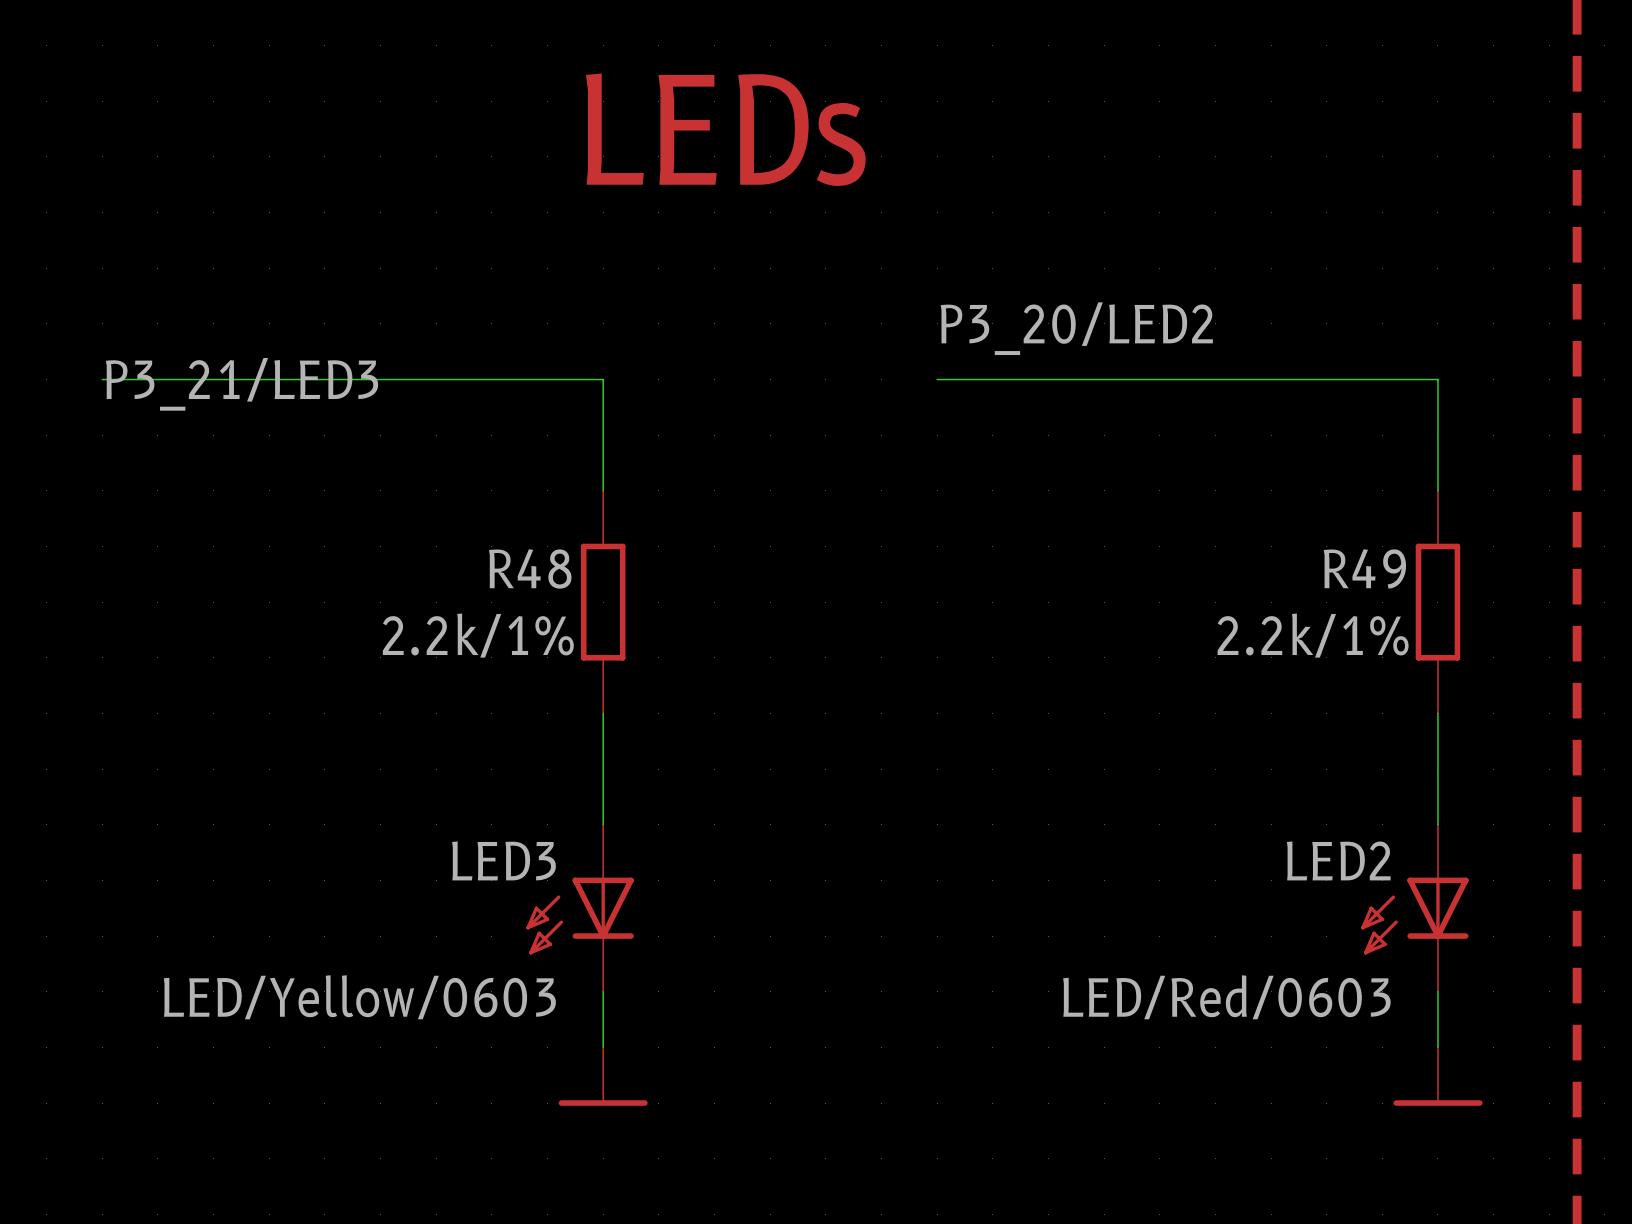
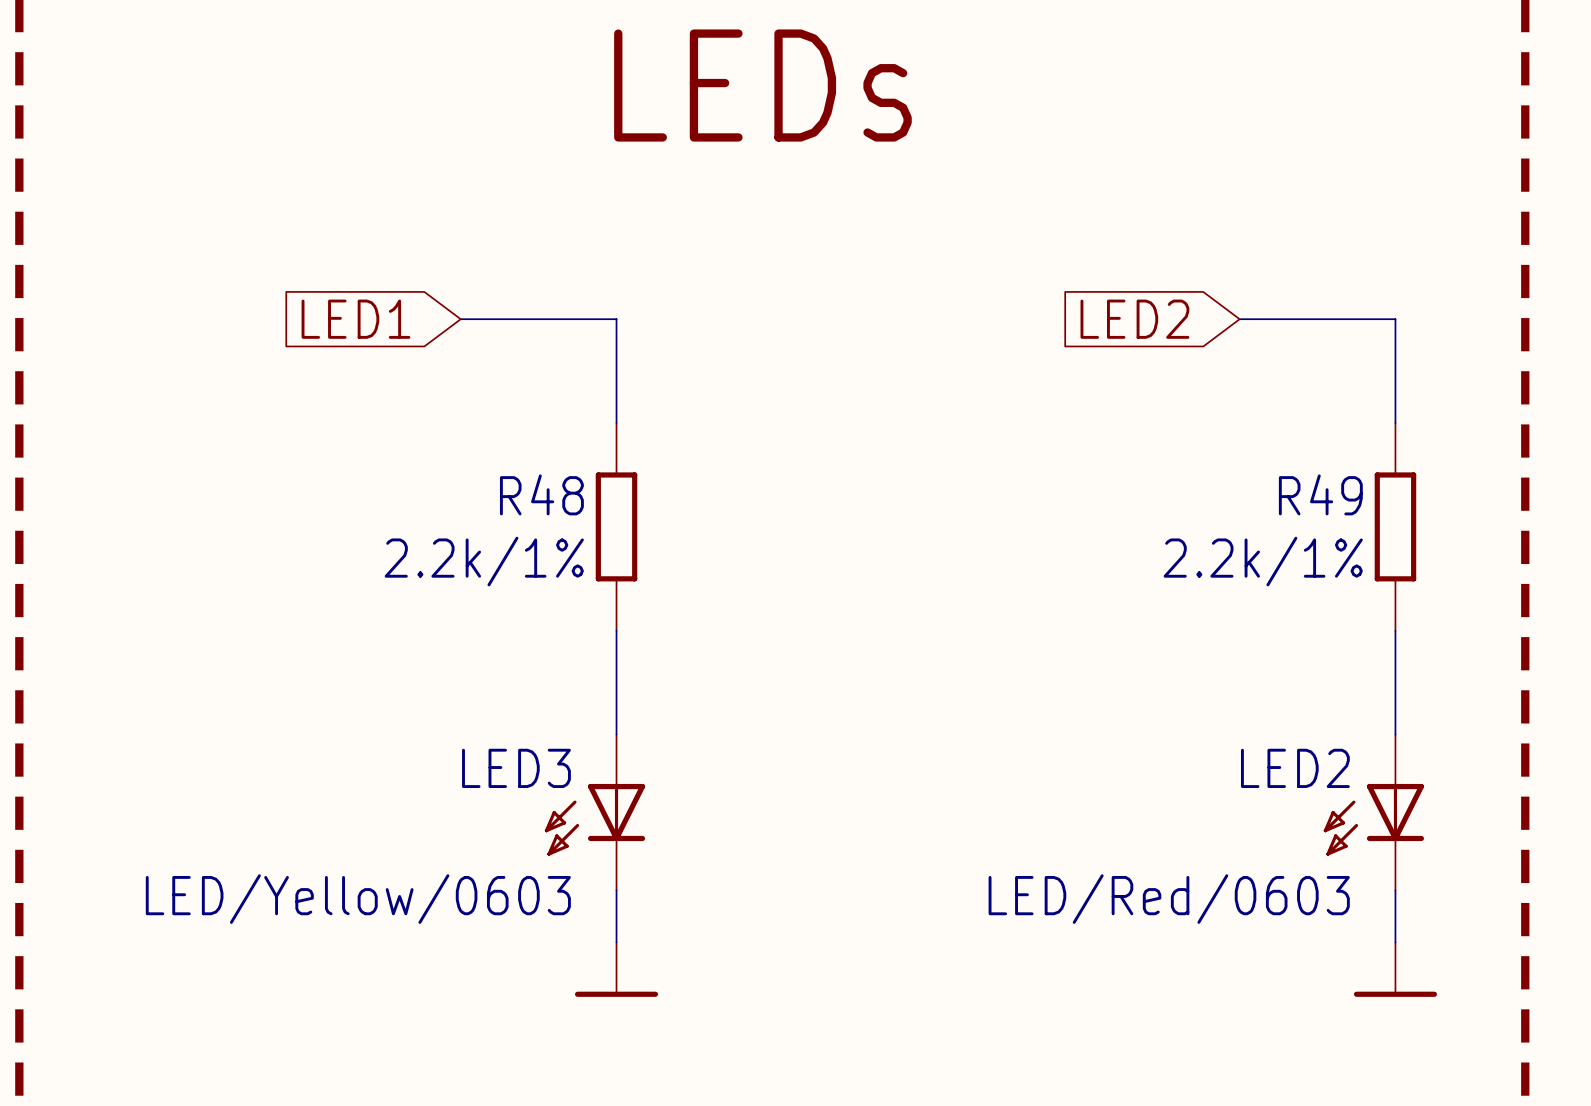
label: P3_20/LED2 (1076, 328) -> none
wire: (102, 379) (436, 379) -> none
global label: none -> LED1 (356, 319)
wire: (937, 379) (1271, 379) -> none
global label: none -> LED2 (1134, 319)
label: P3_21/LED3 (242, 384) -> none

